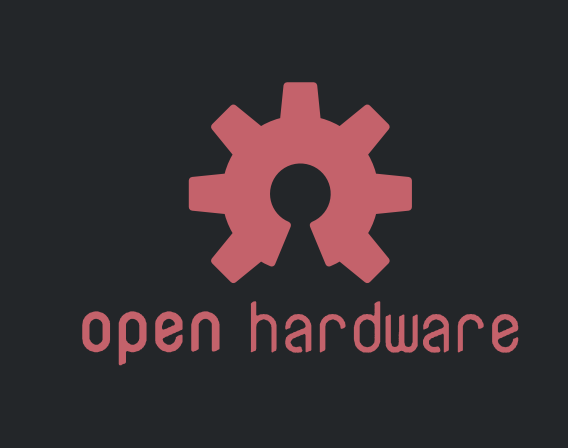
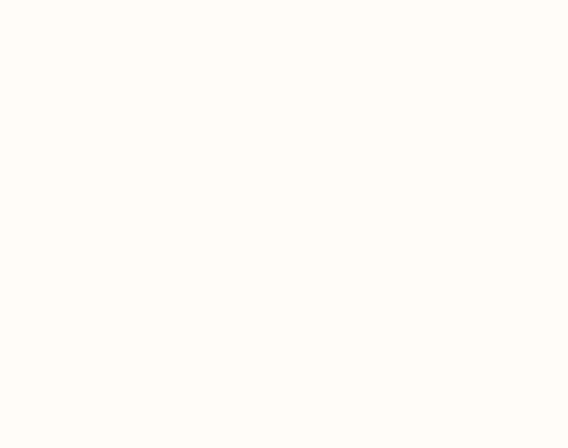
part: (300, 223) -> none

